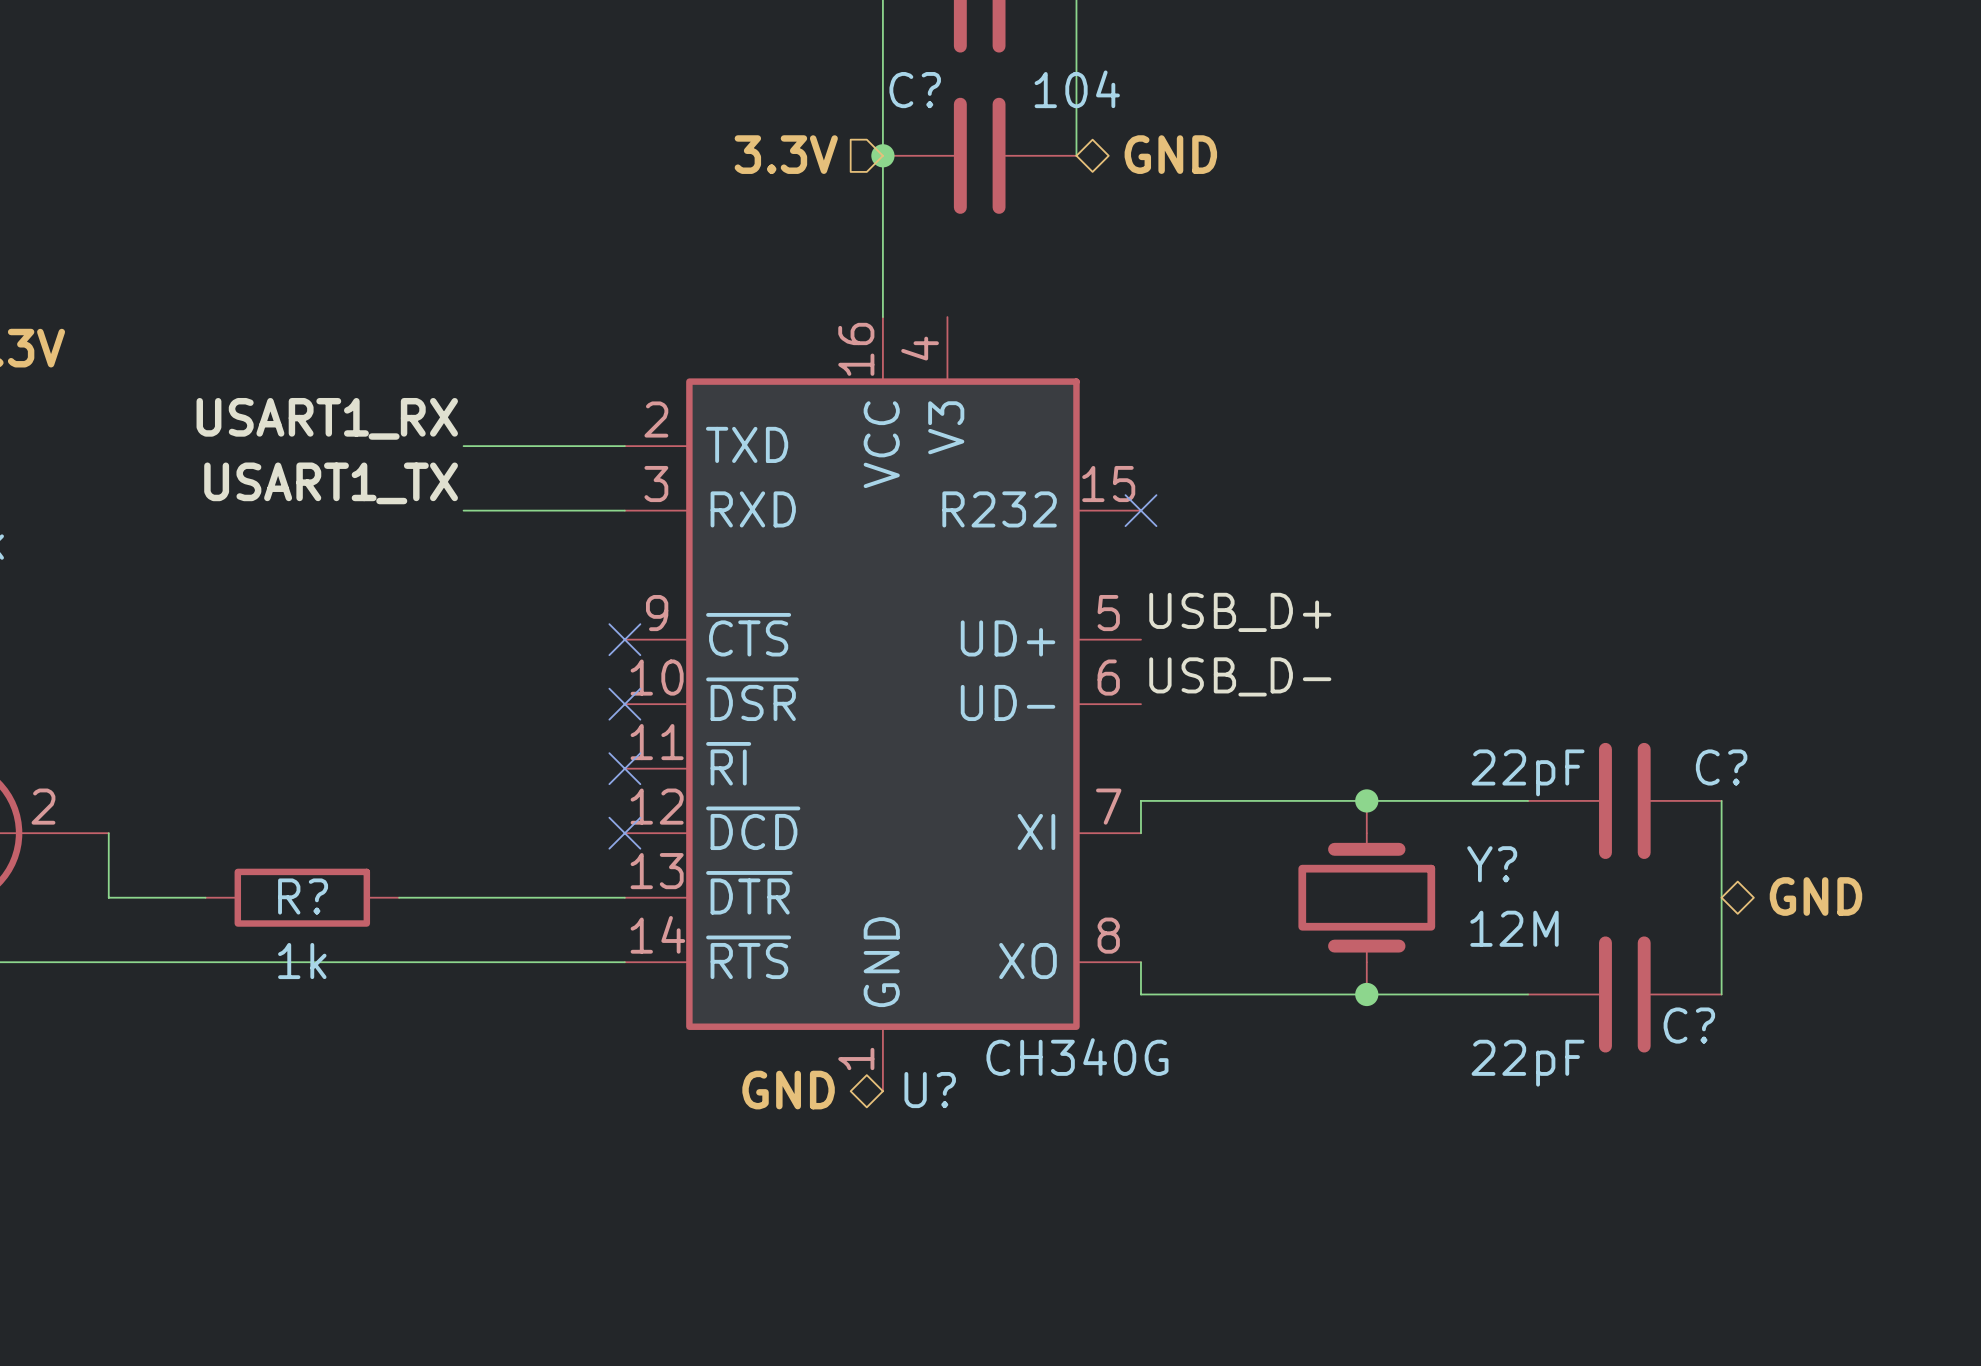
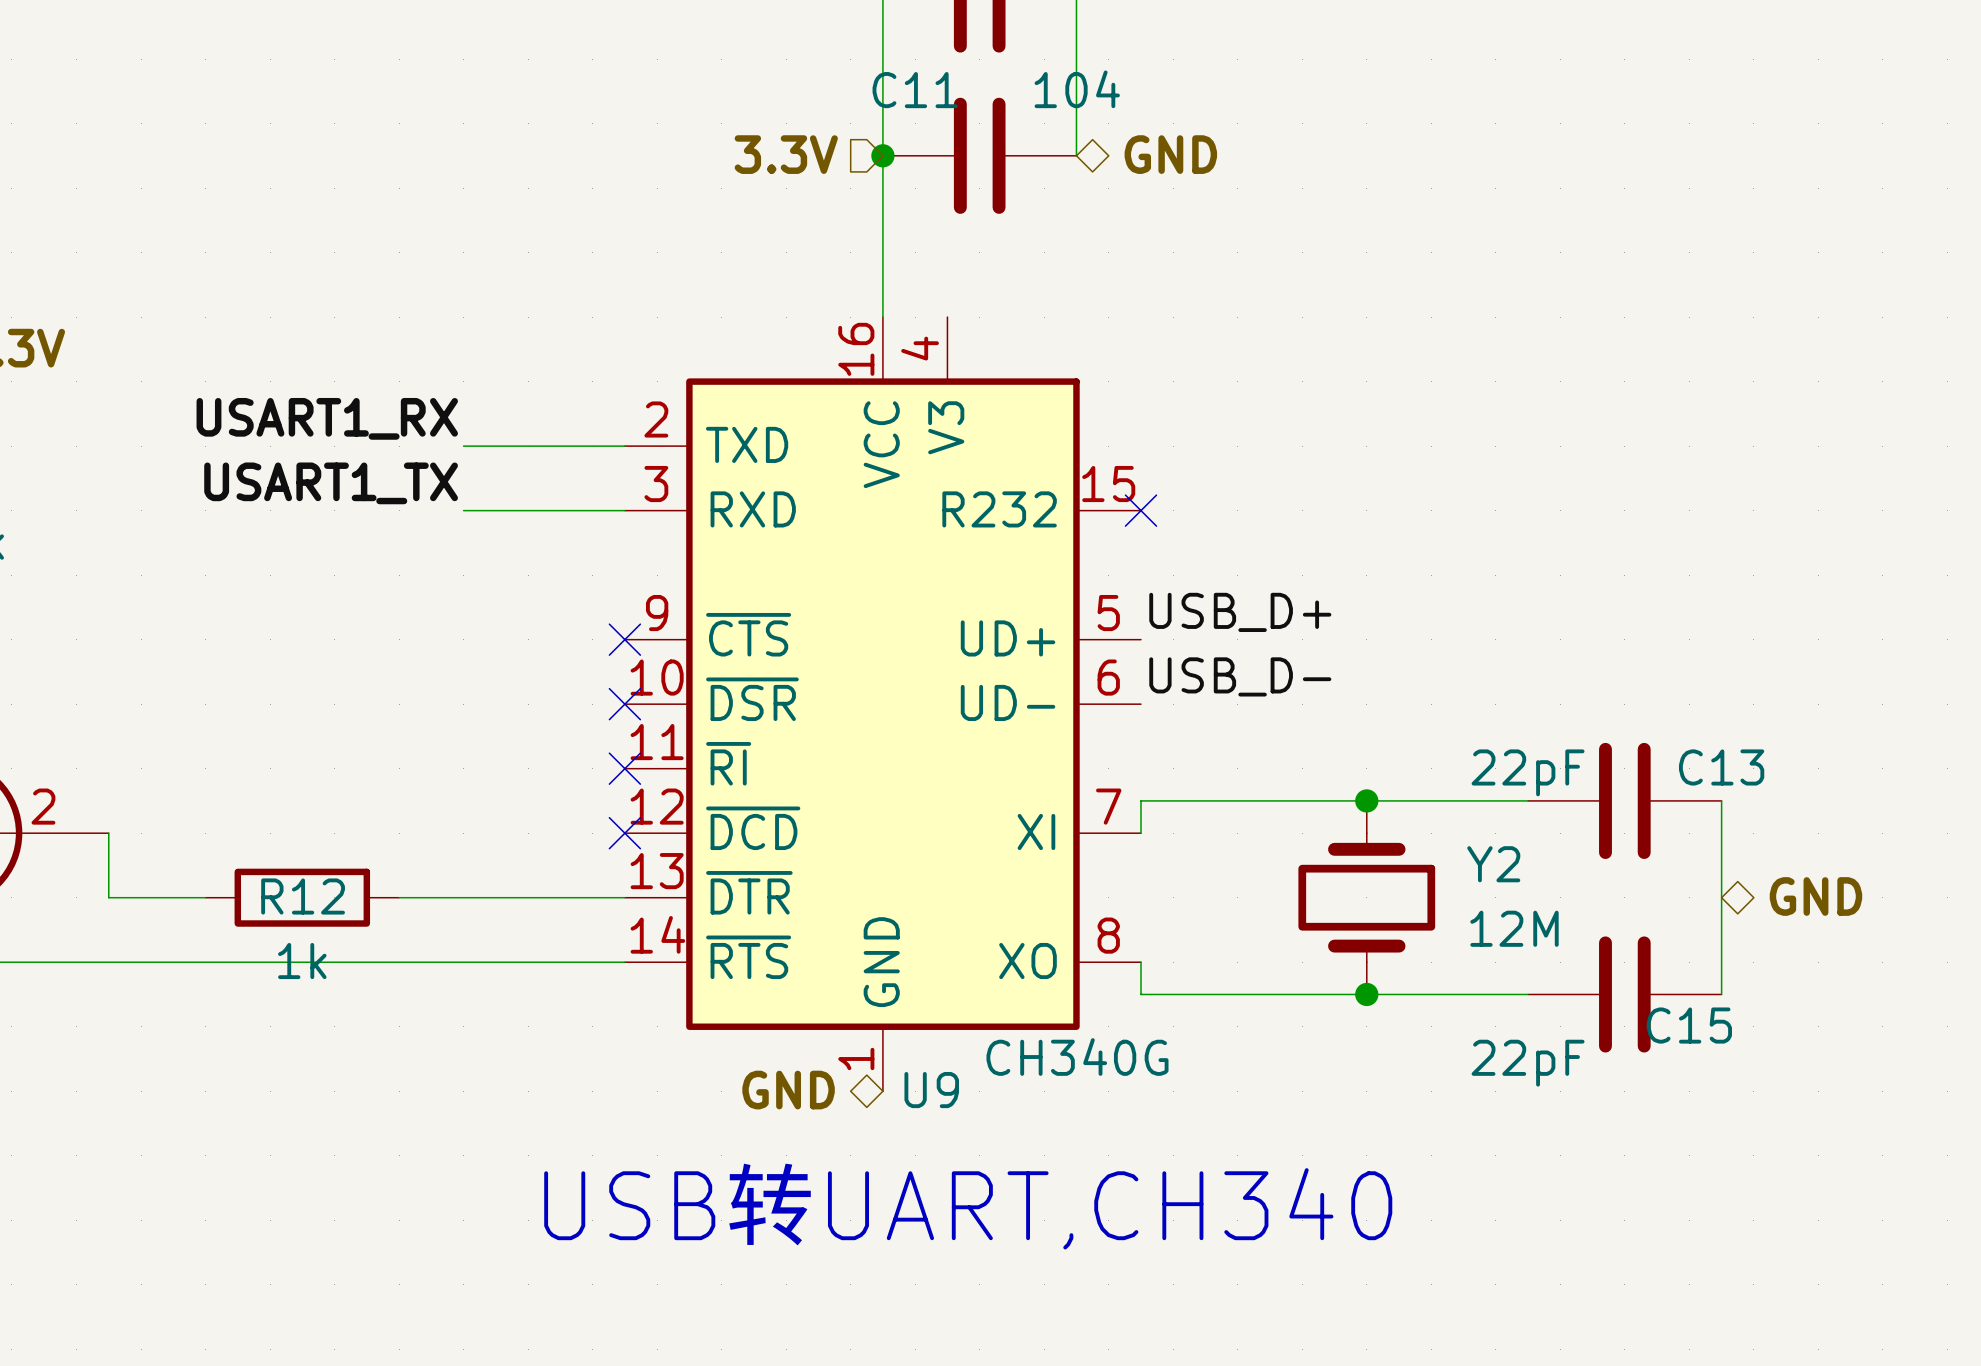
C? name: C? (915, 90) -> C11 (915, 90)
C? name: C? (1721, 767) -> C13 (1721, 767)
Y? name: Y? (1492, 864) -> Y2 (1493, 864)
R? name: R? (303, 896) -> R12 (303, 896)
C? name: C? (1689, 1025) -> C15 (1689, 1025)
U? name: U? (930, 1090) -> U9 (931, 1090)
text: none -> USB转UART,CH340 (968, 1205)

